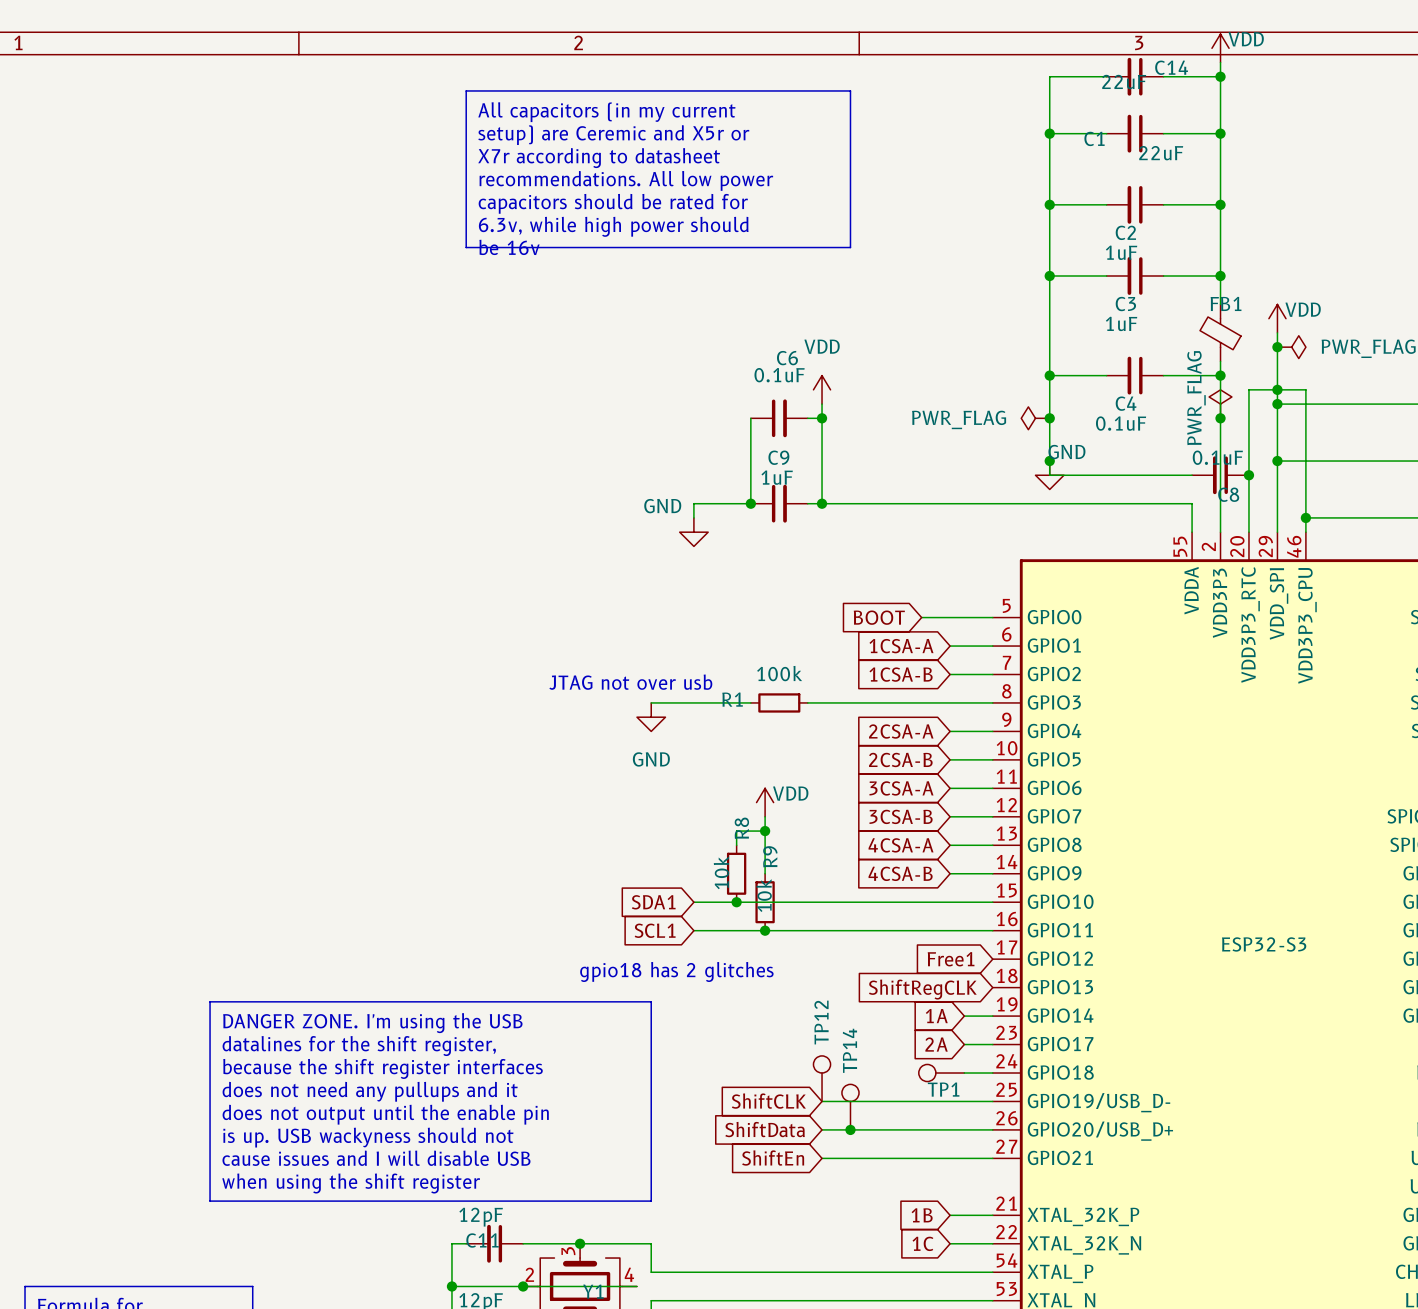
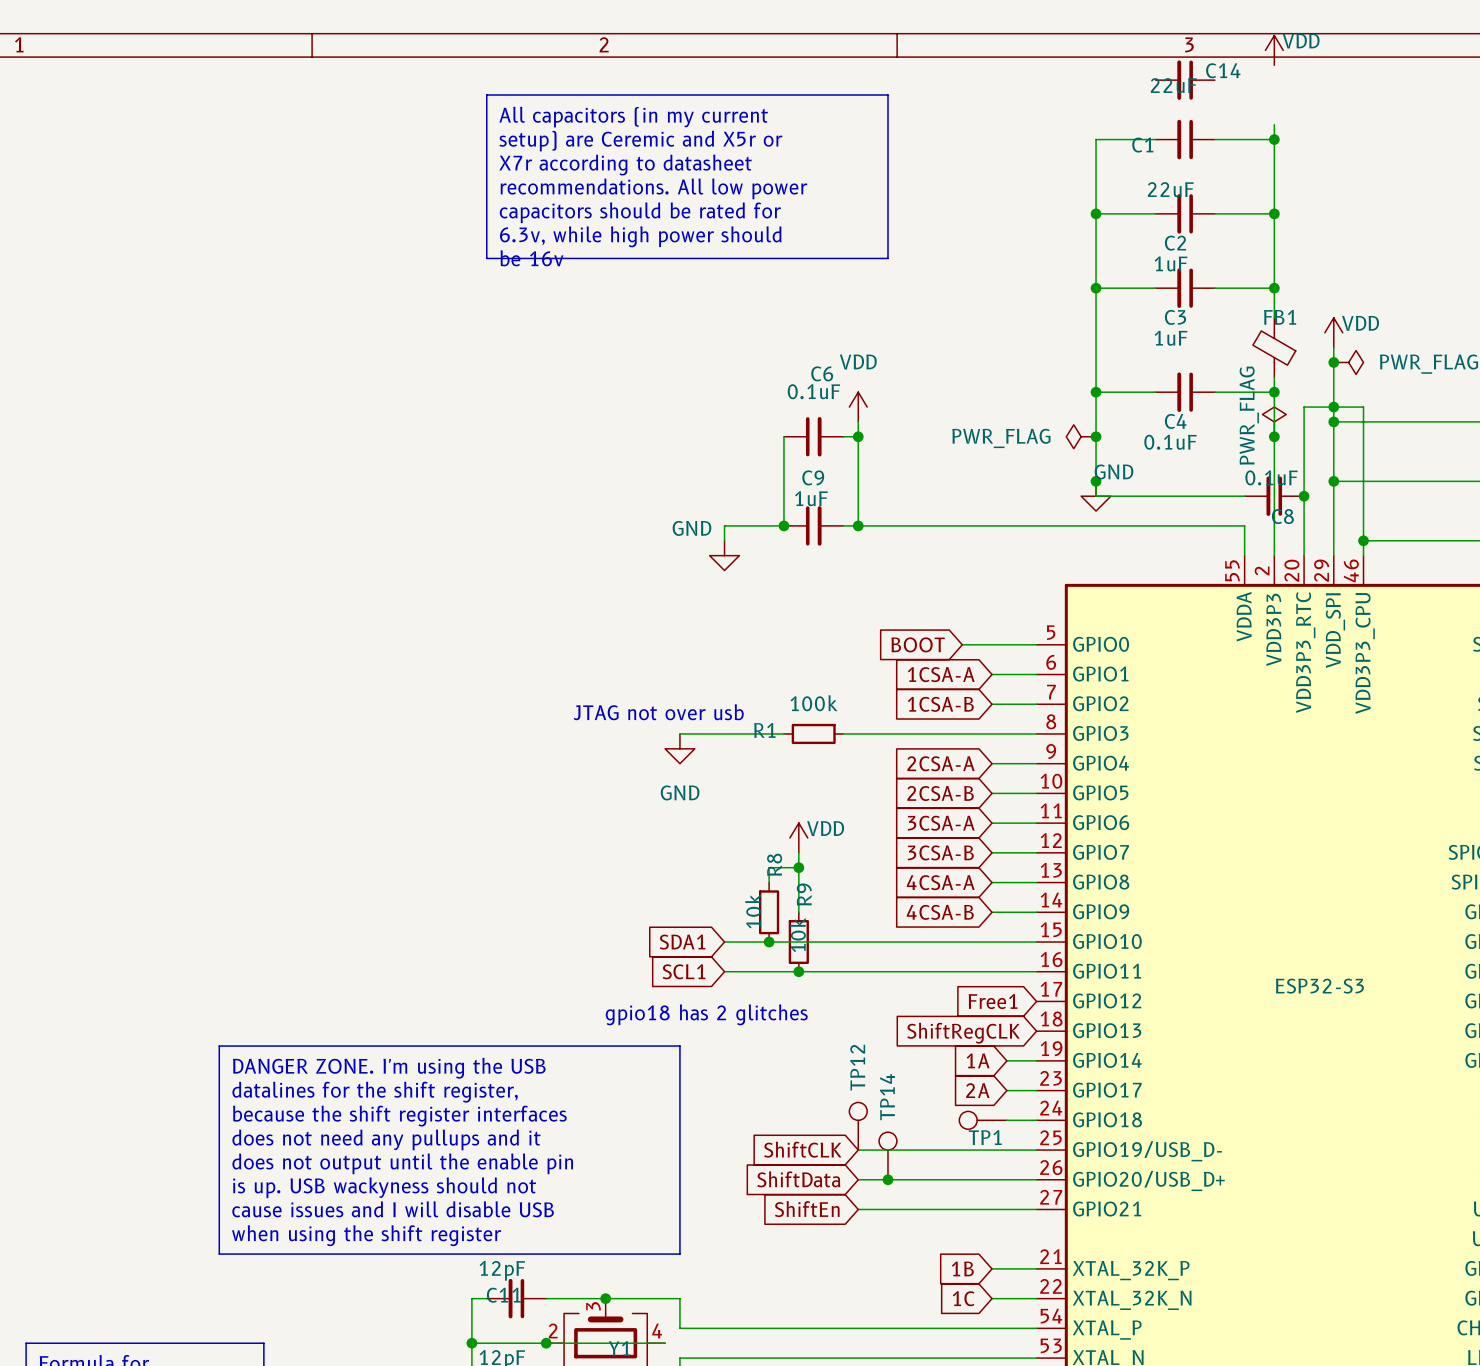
wire: (1220, 62) (1220, 119) -> none
wire: (1106, 76) (1049, 76) (1049, 133) -> none
wire: (1163, 76) (1220, 76) -> none
junction: (1220, 76) -> none
junction: (1049, 133) -> none
C1 value position: 22uF (1161, 153) -> 22uF (1170, 189)

